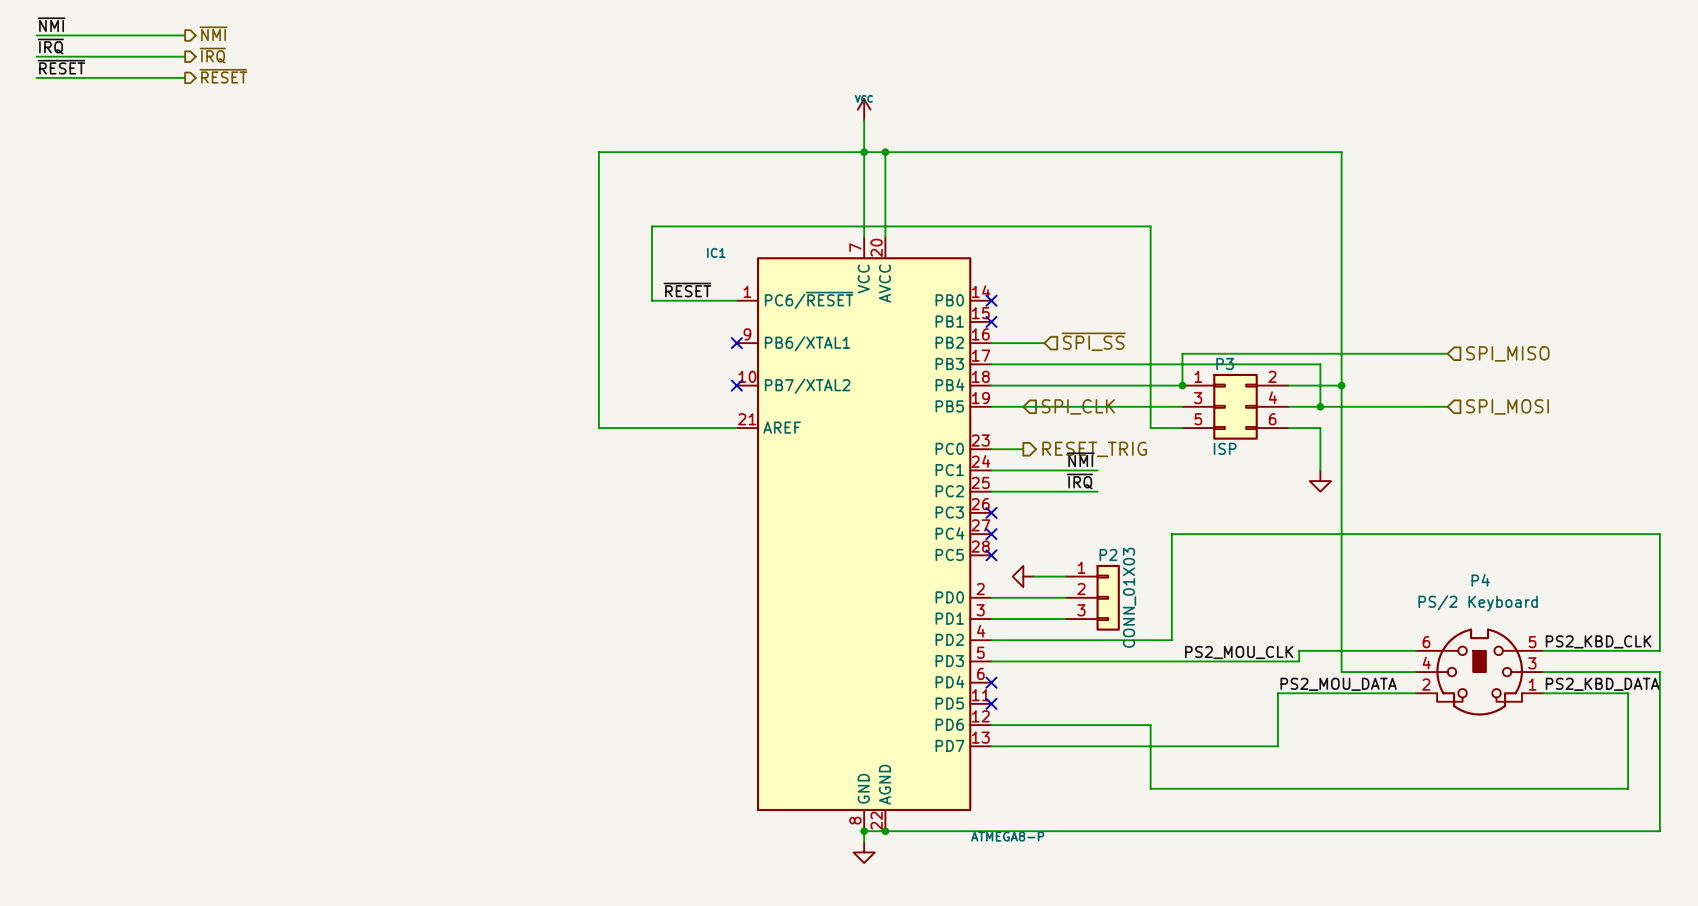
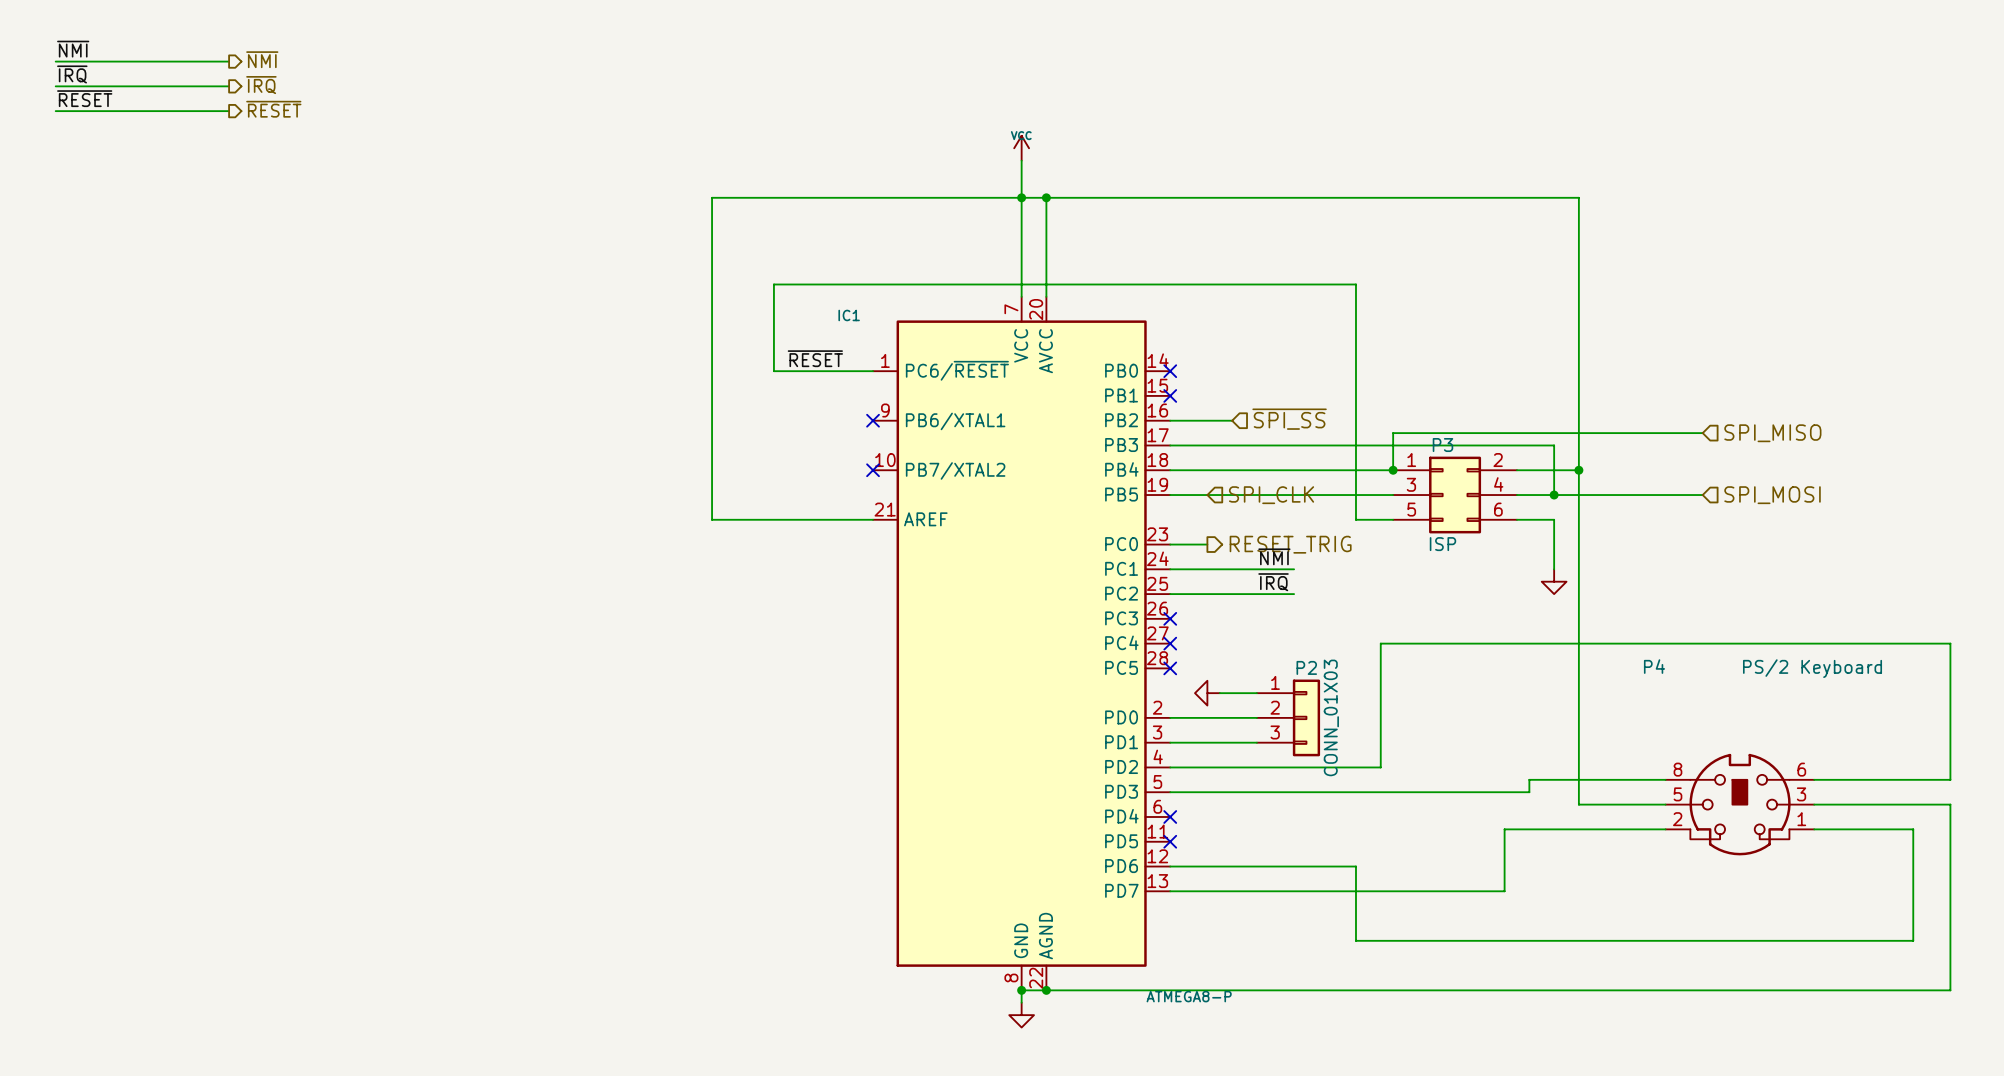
P4 name position: P4 (1480, 580) -> P4 (1654, 666)
P4 value position: PS/2 Keyboard (1478, 603) -> PS/2 Keyboard (1812, 668)
label: PS2_KBD_CLK (1598, 641) -> none
P4 pin number: 6 (1426, 642) -> 8 (1677, 769)
P4 pin number: 5 (1532, 642) -> 6 (1801, 769)
label: PS2_MOU_CLK (1239, 652) -> none
P4 pin number: 4 (1426, 663) -> 5 (1677, 794)
label: PS2_MOU_DATA (1338, 684) -> none
label: PS2_KBD_DATA (1602, 684) -> none

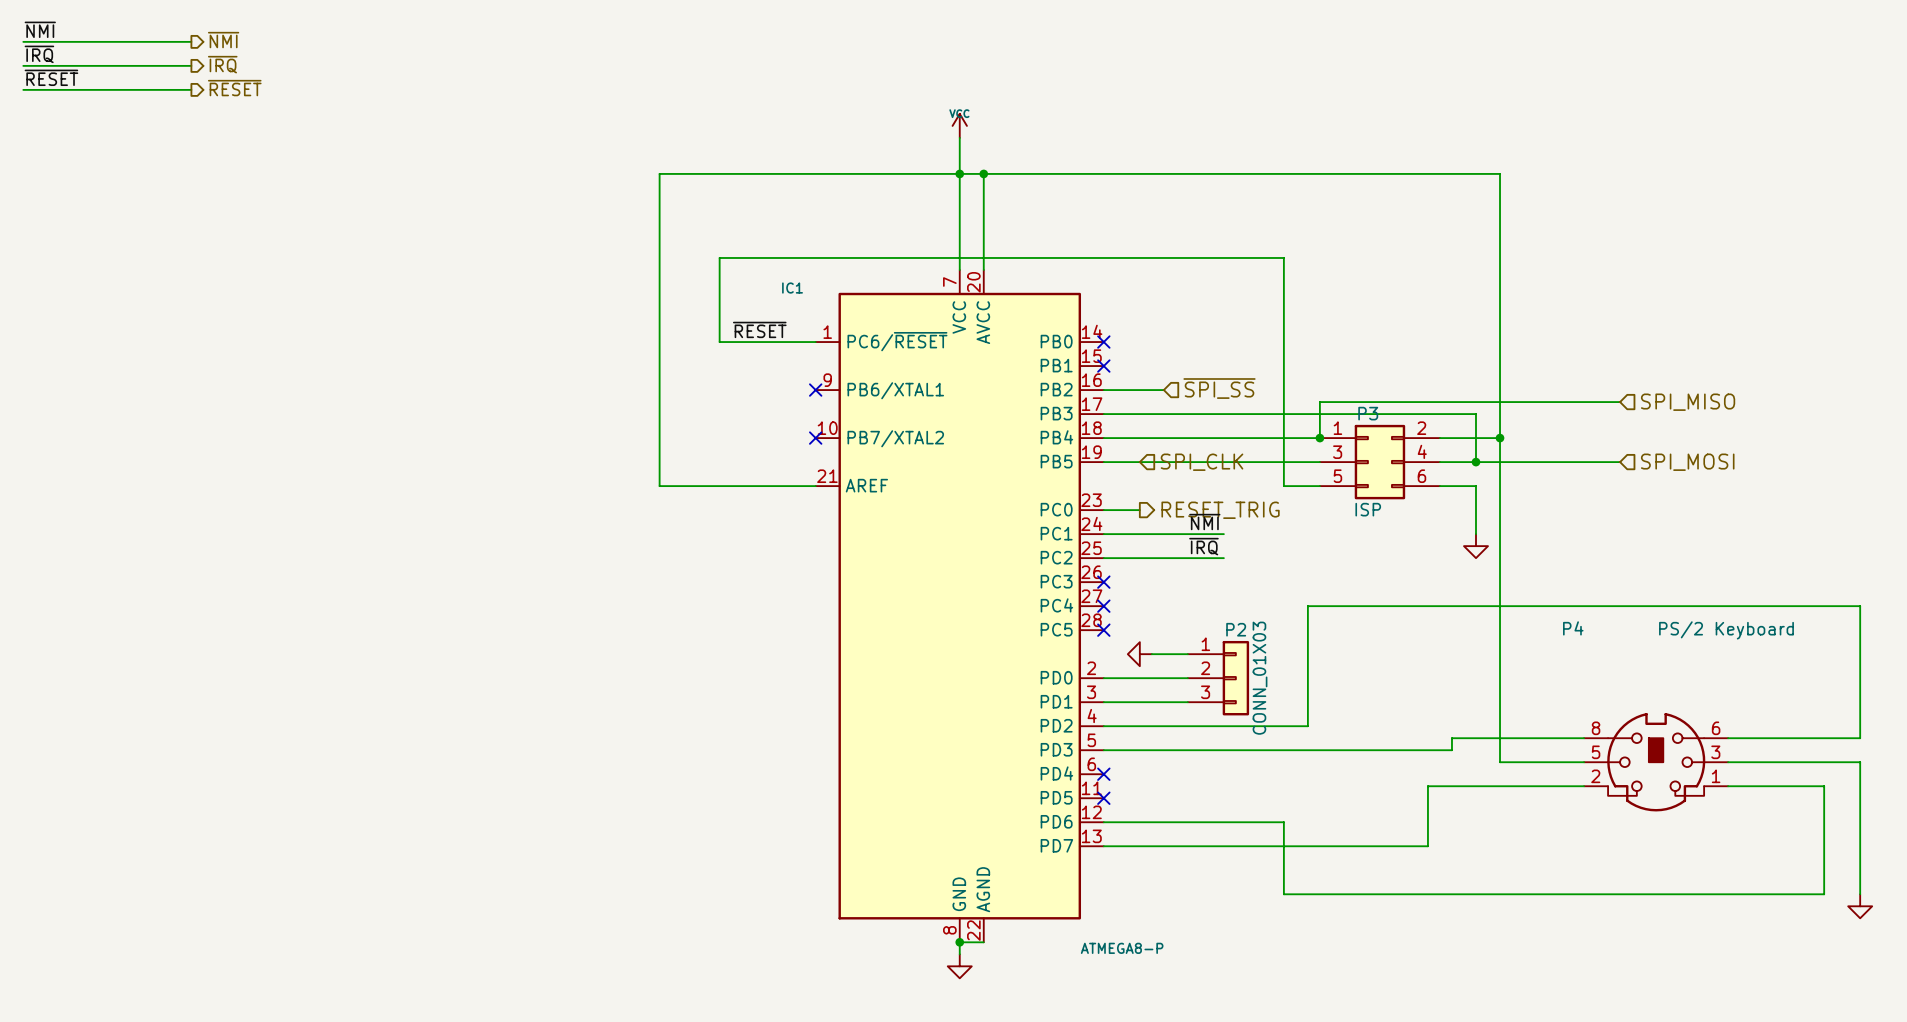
wire: (1950, 940) (1950, 990) (1046, 990) -> none
power symbol: none -> (1860, 906)
junction: (1046, 990) -> none

